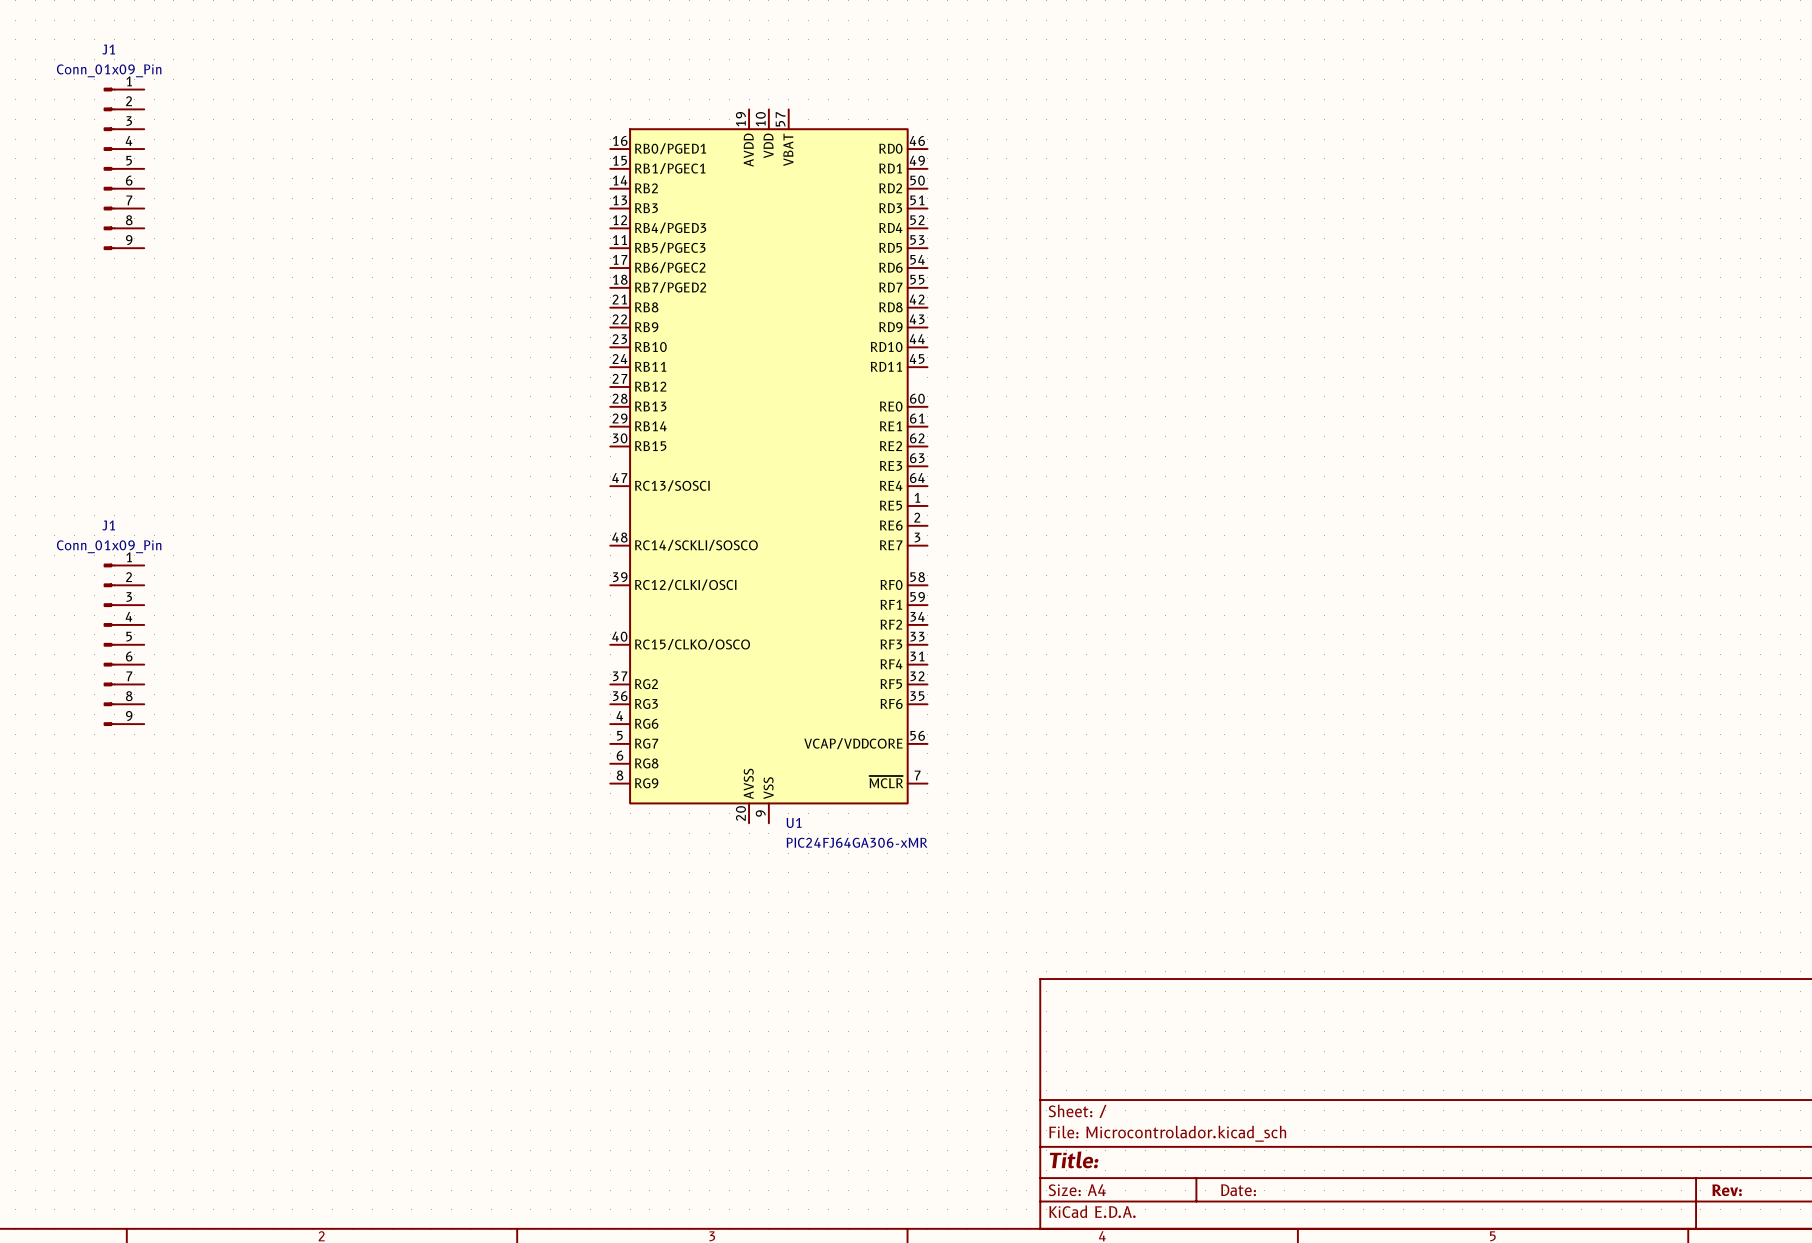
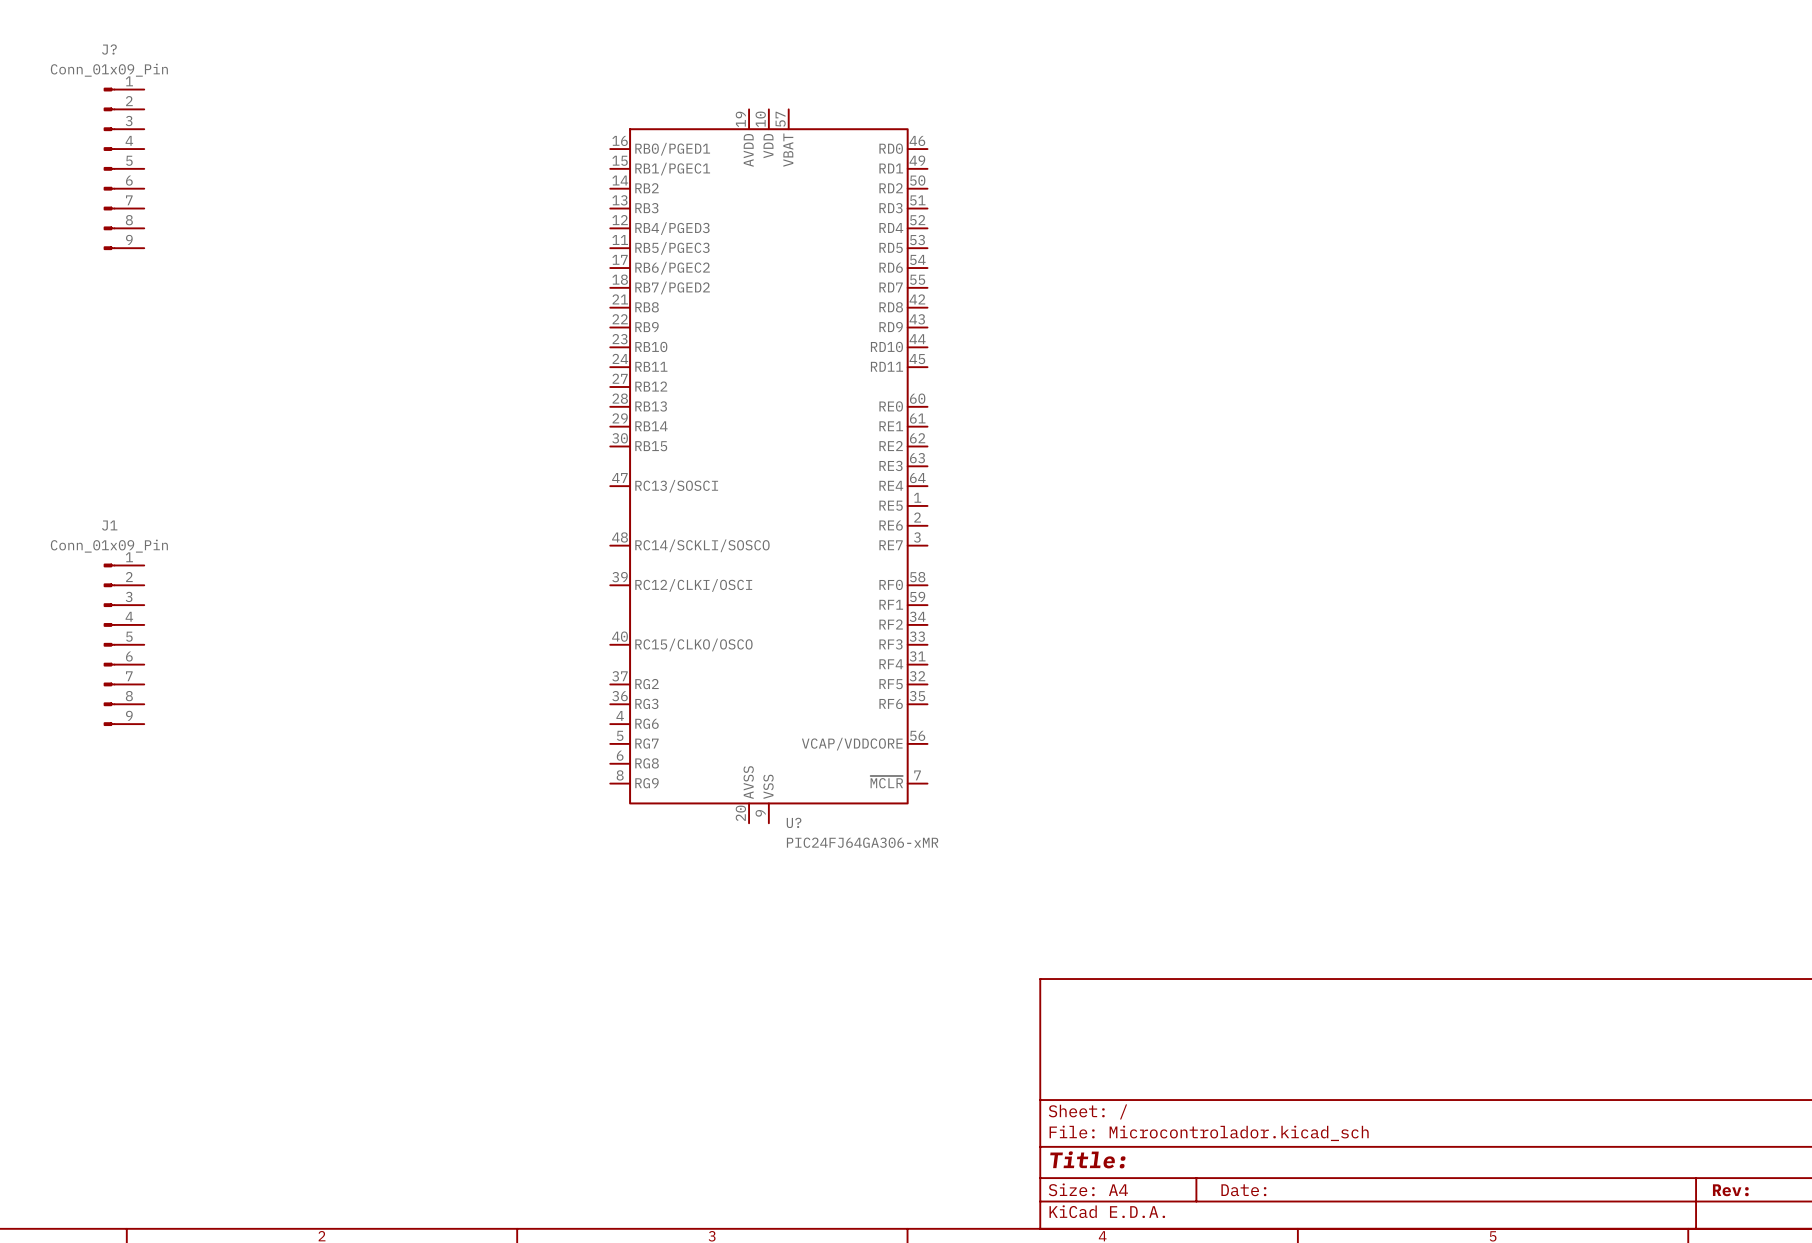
J1 name: J1 (108, 49) -> J? (109, 49)
U1 name: U1 (794, 822) -> U? (794, 822)

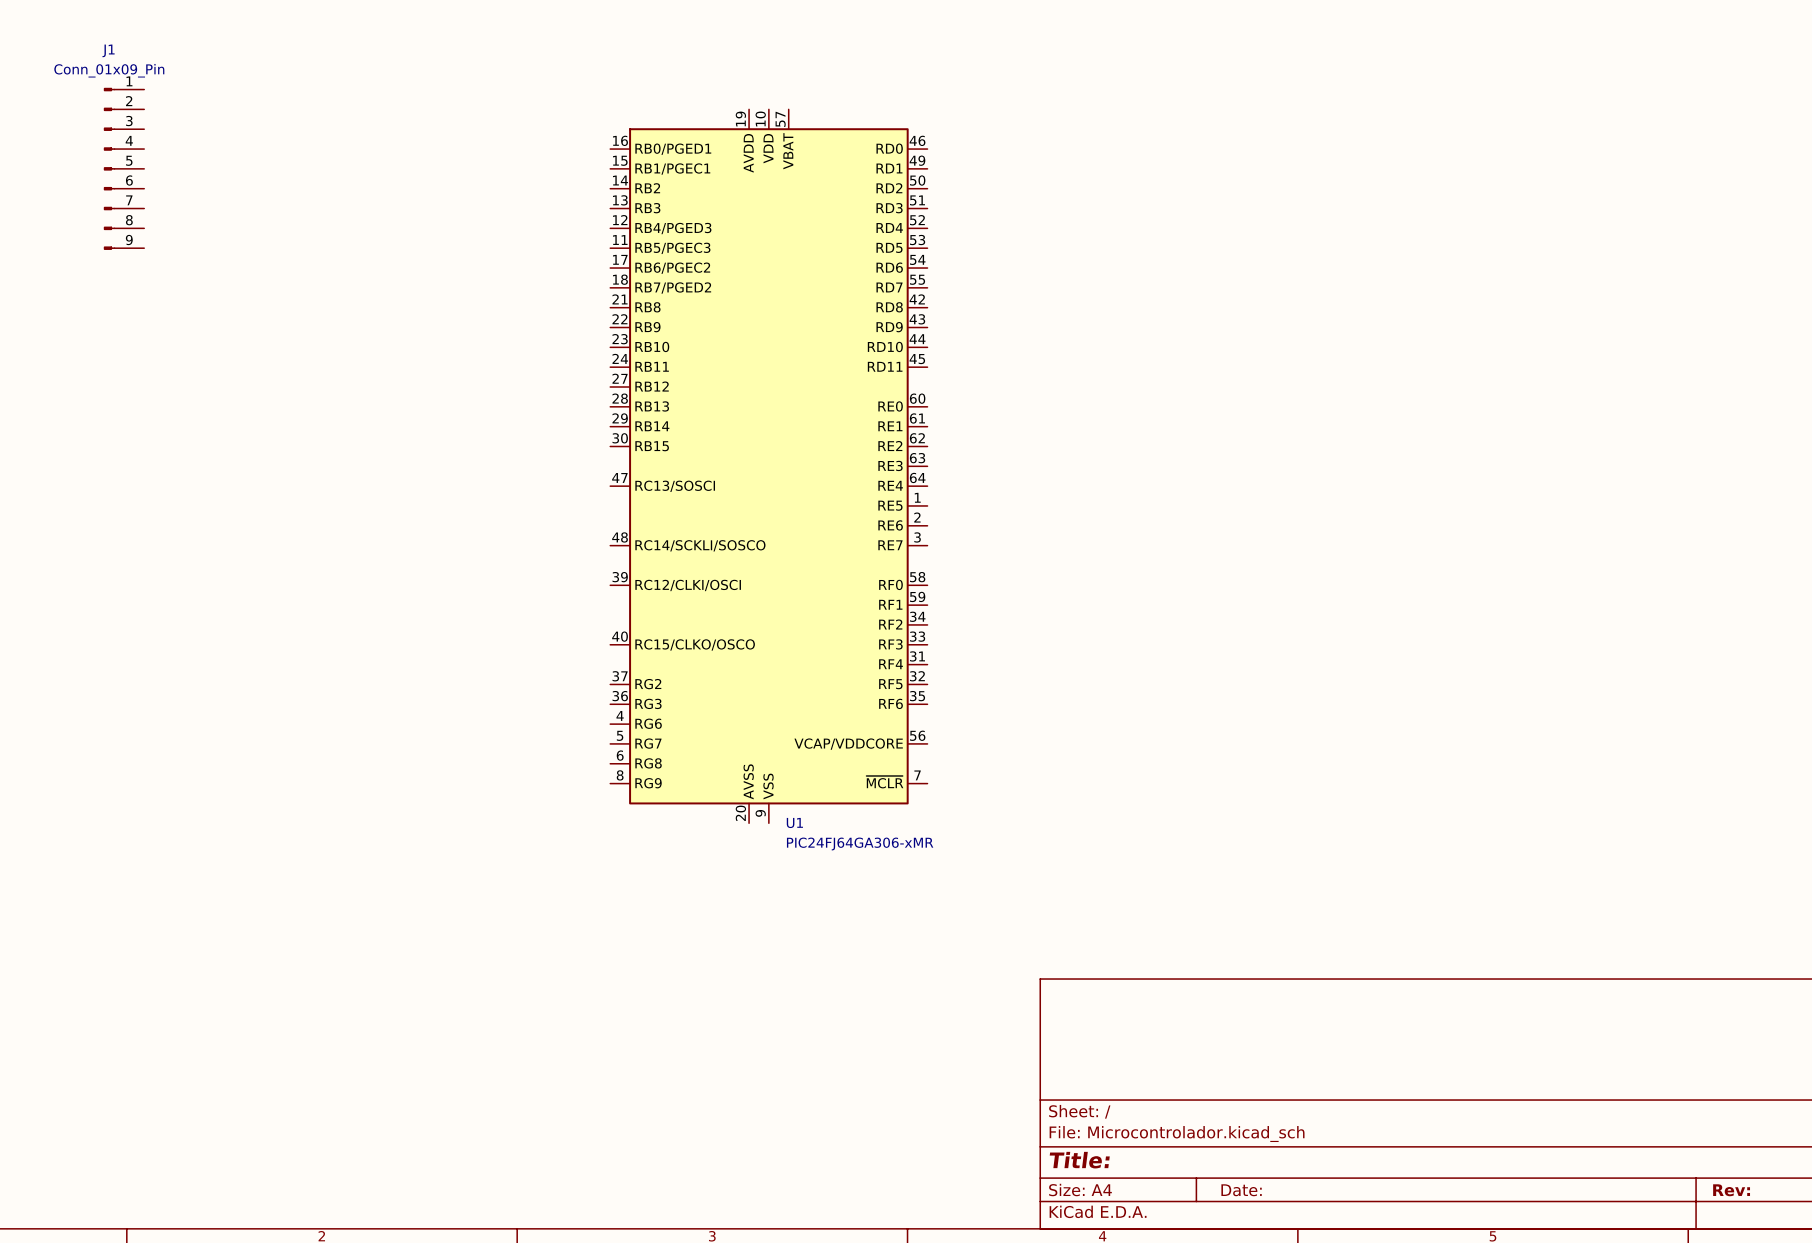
J? name: J? (109, 49) -> J1 (108, 50)
J1: Conn_01x09_Pin (124, 644) -> none
U? name: U? (794, 822) -> U1 (794, 822)

